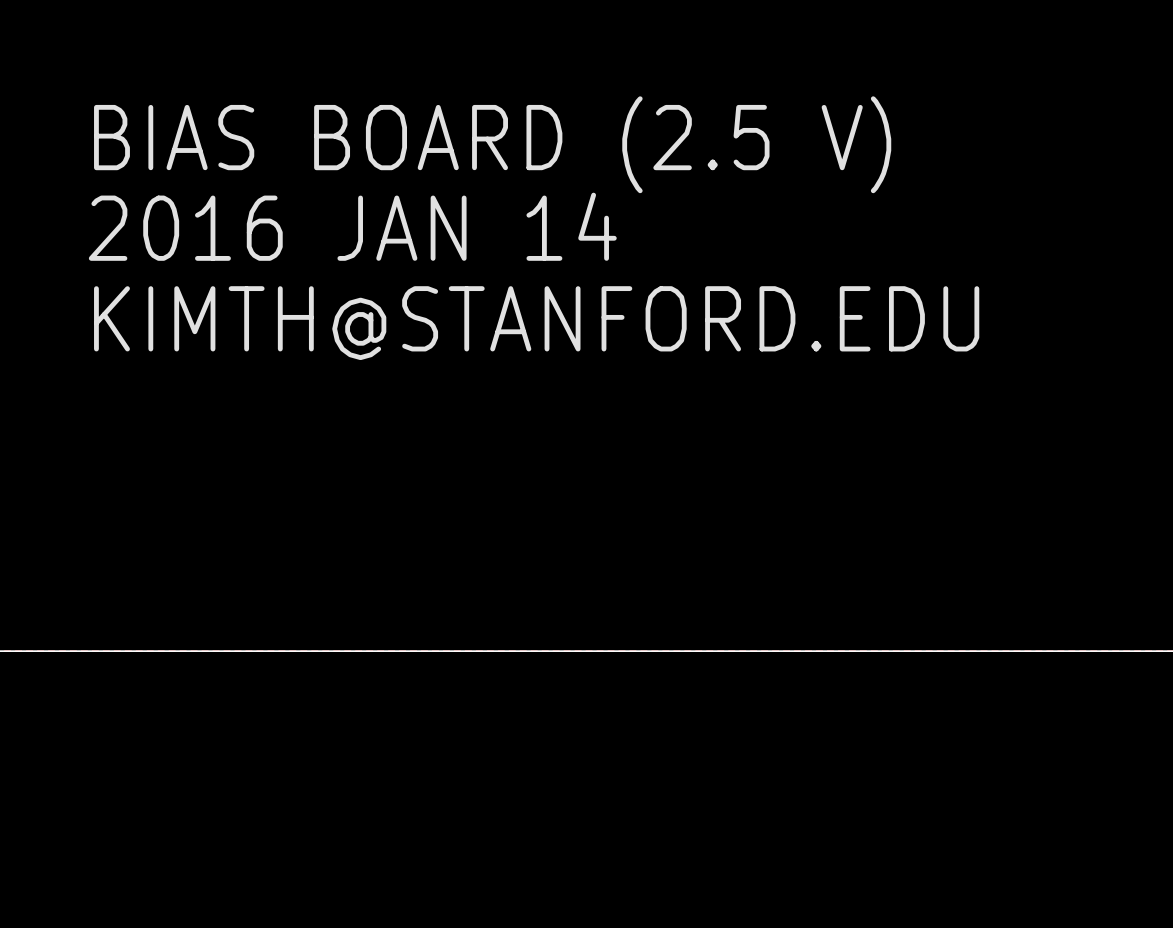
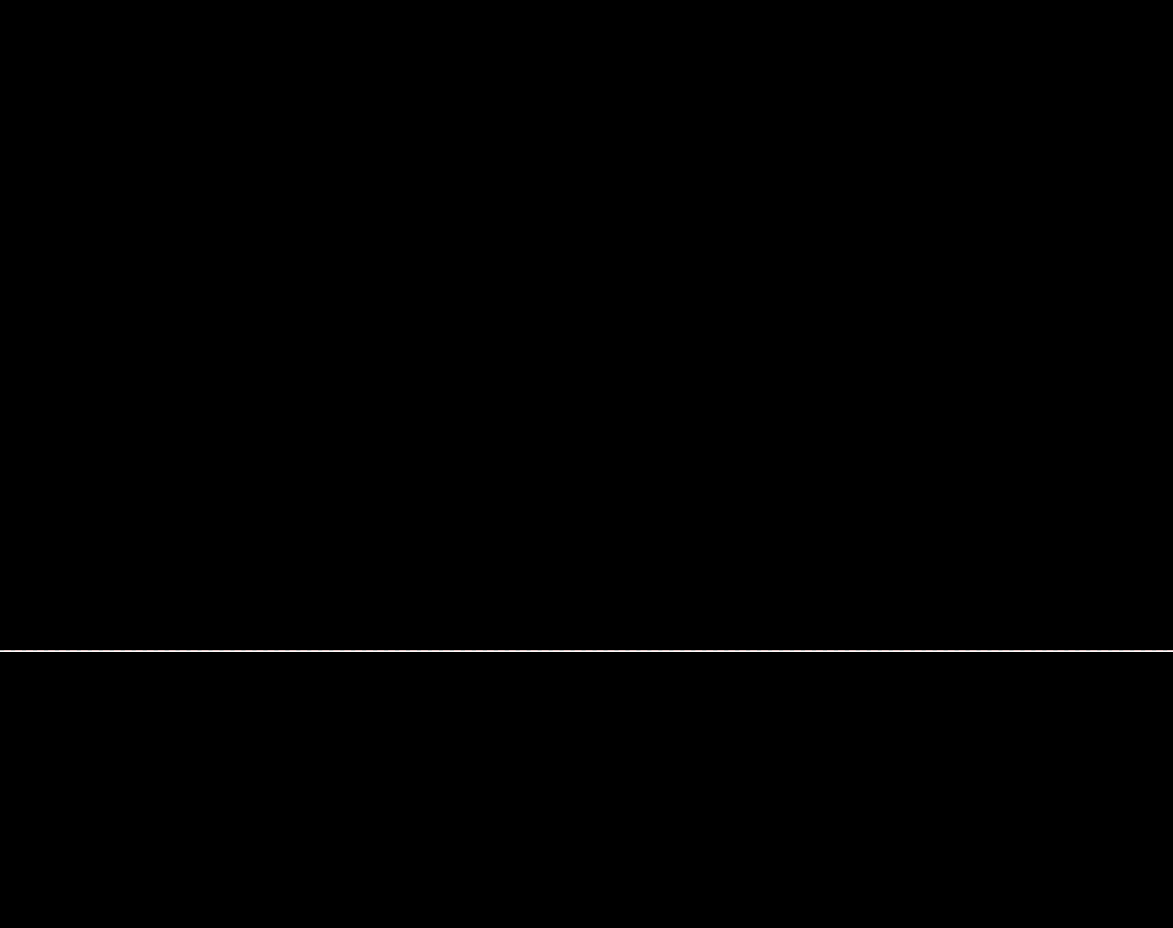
text: BIAS BOARD (2.5 V) (492, 144) -> none
text: 2016 JAN 14 (352, 226) -> none
text: KIMTH@STANFORD.EDU (536, 323) -> none

